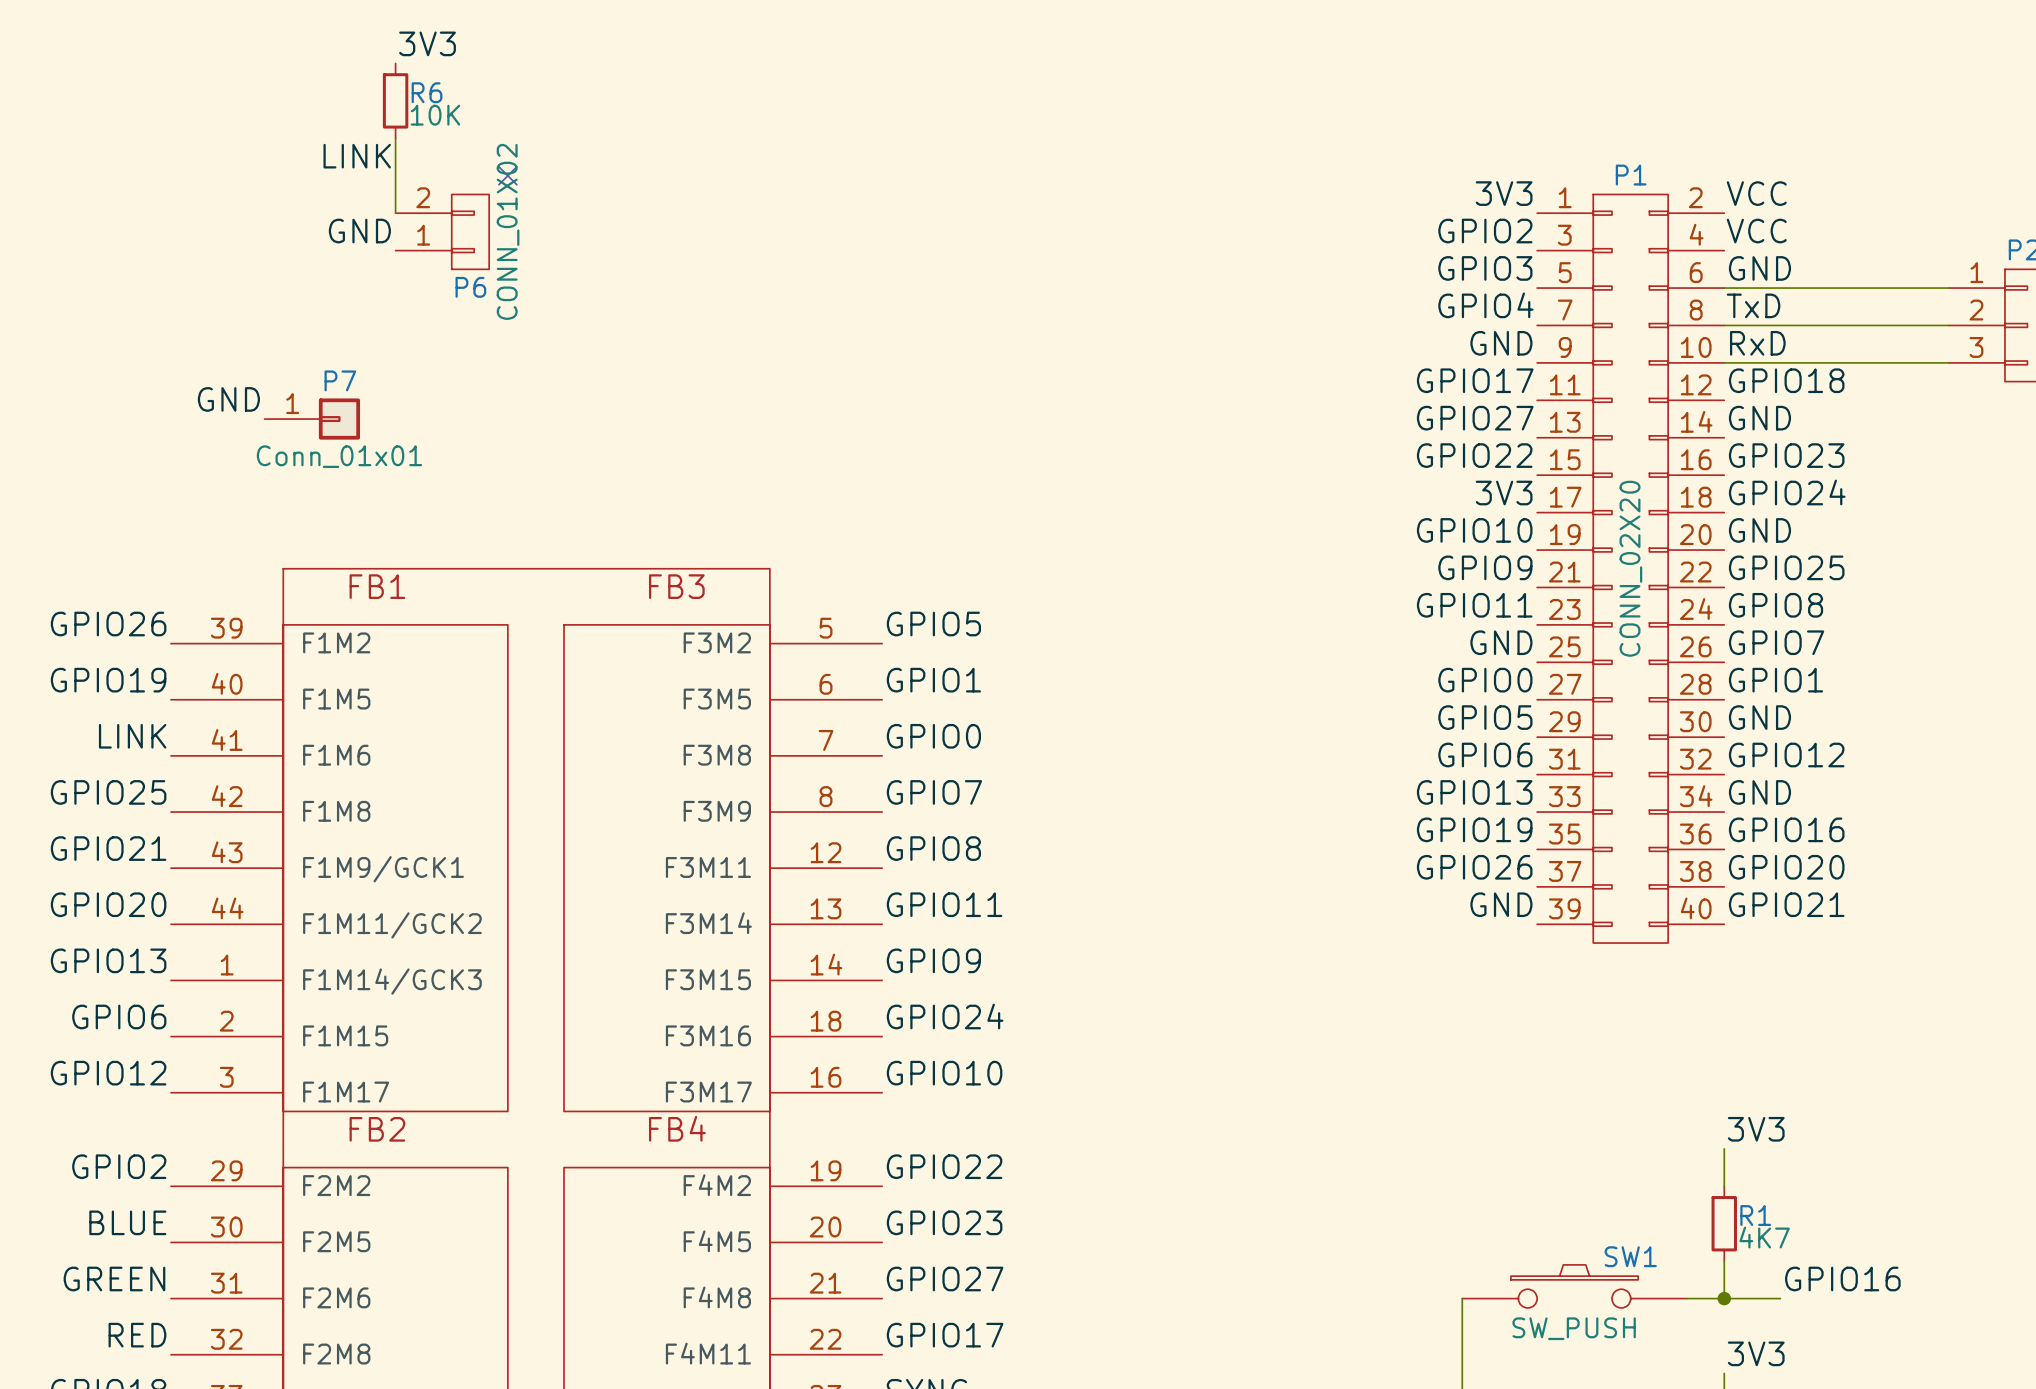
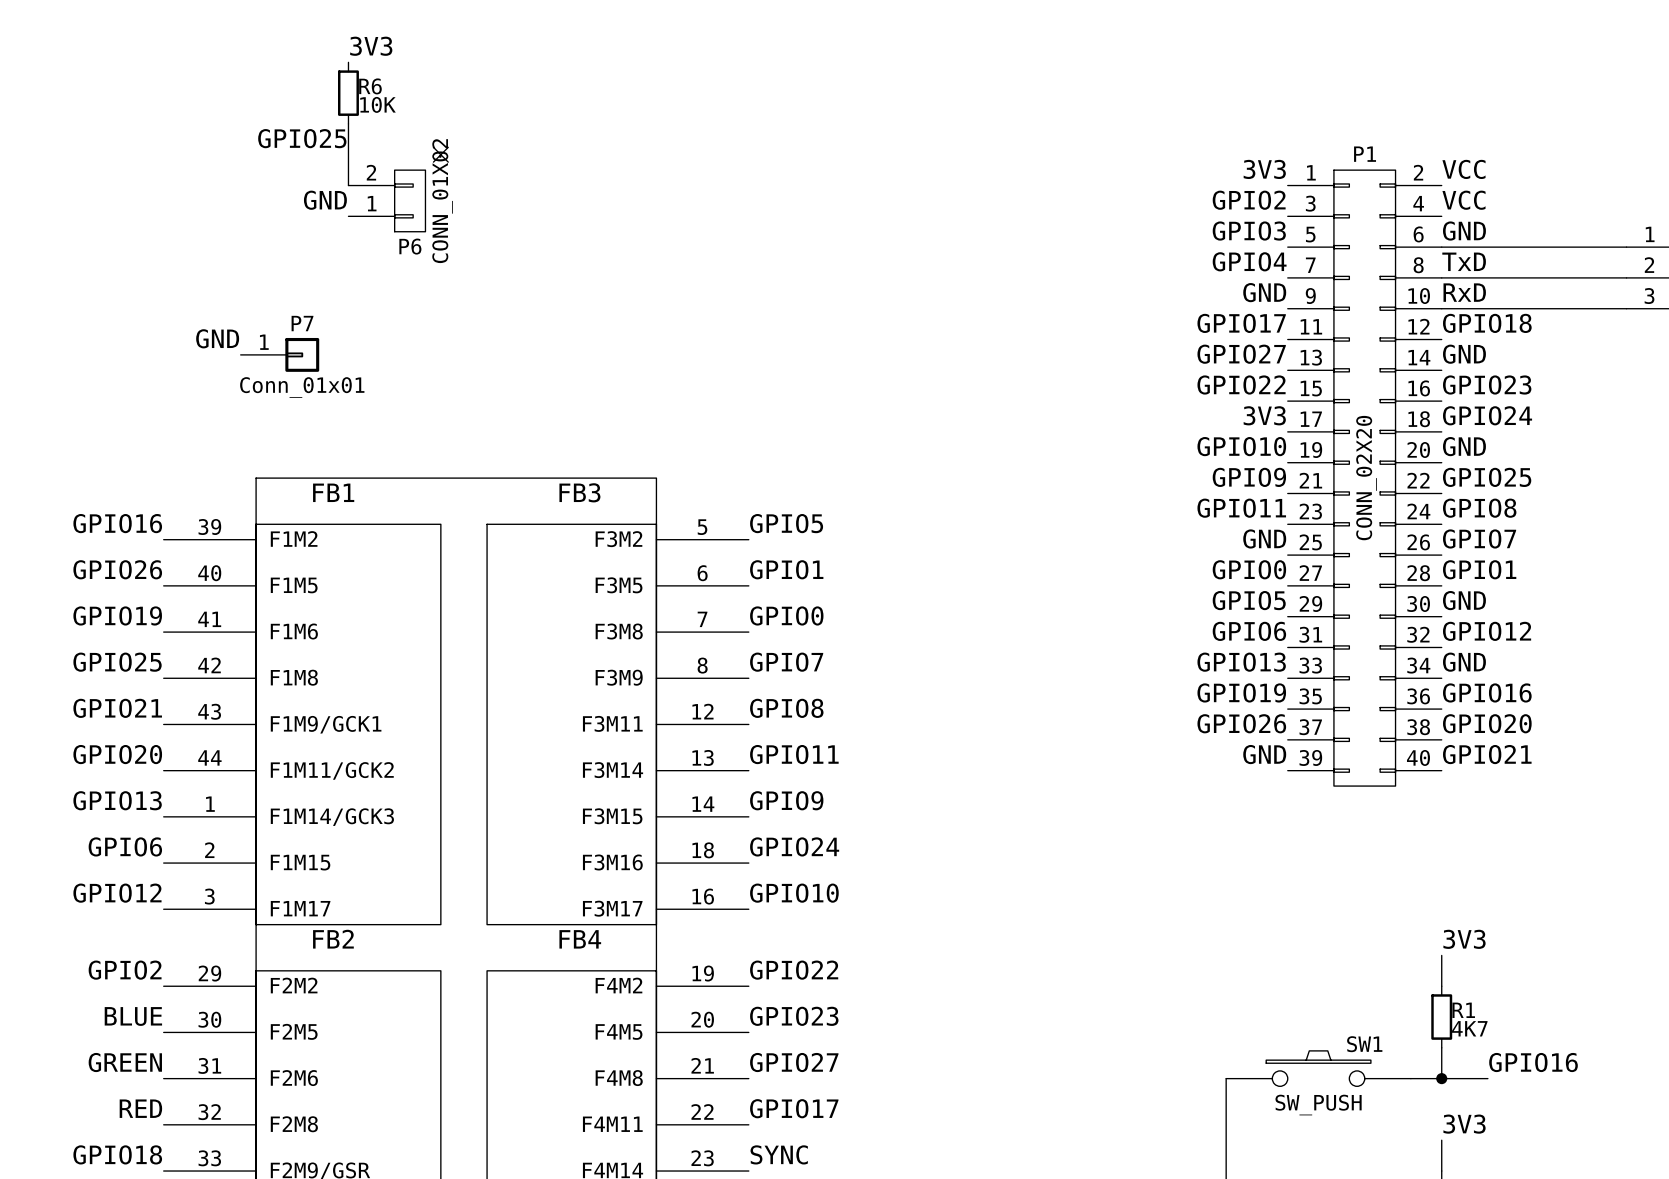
label: LINK (357, 156) -> GPIO25 (302, 138)
label: GPIO26 (108, 624) -> GPIO16 (117, 523)
label: GPIO19 (108, 680) -> GPIO26 (117, 569)
label: LINK (132, 736) -> GPIO19 (117, 615)

